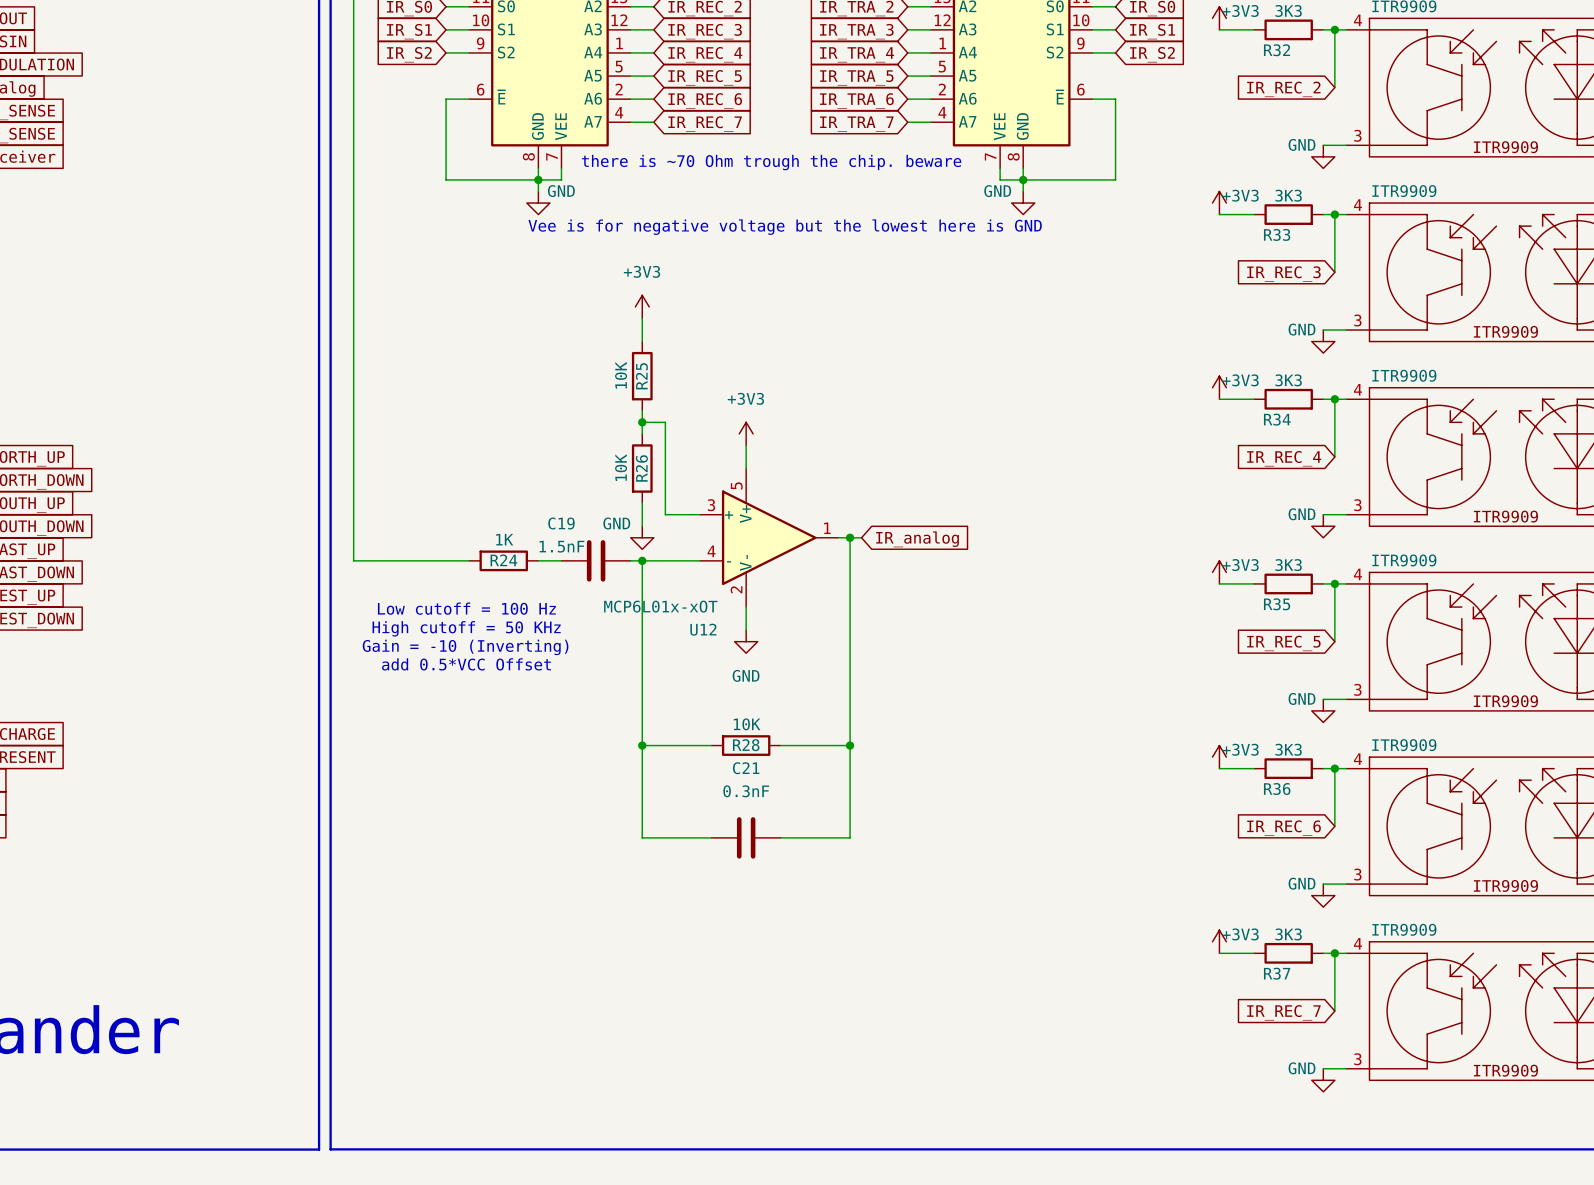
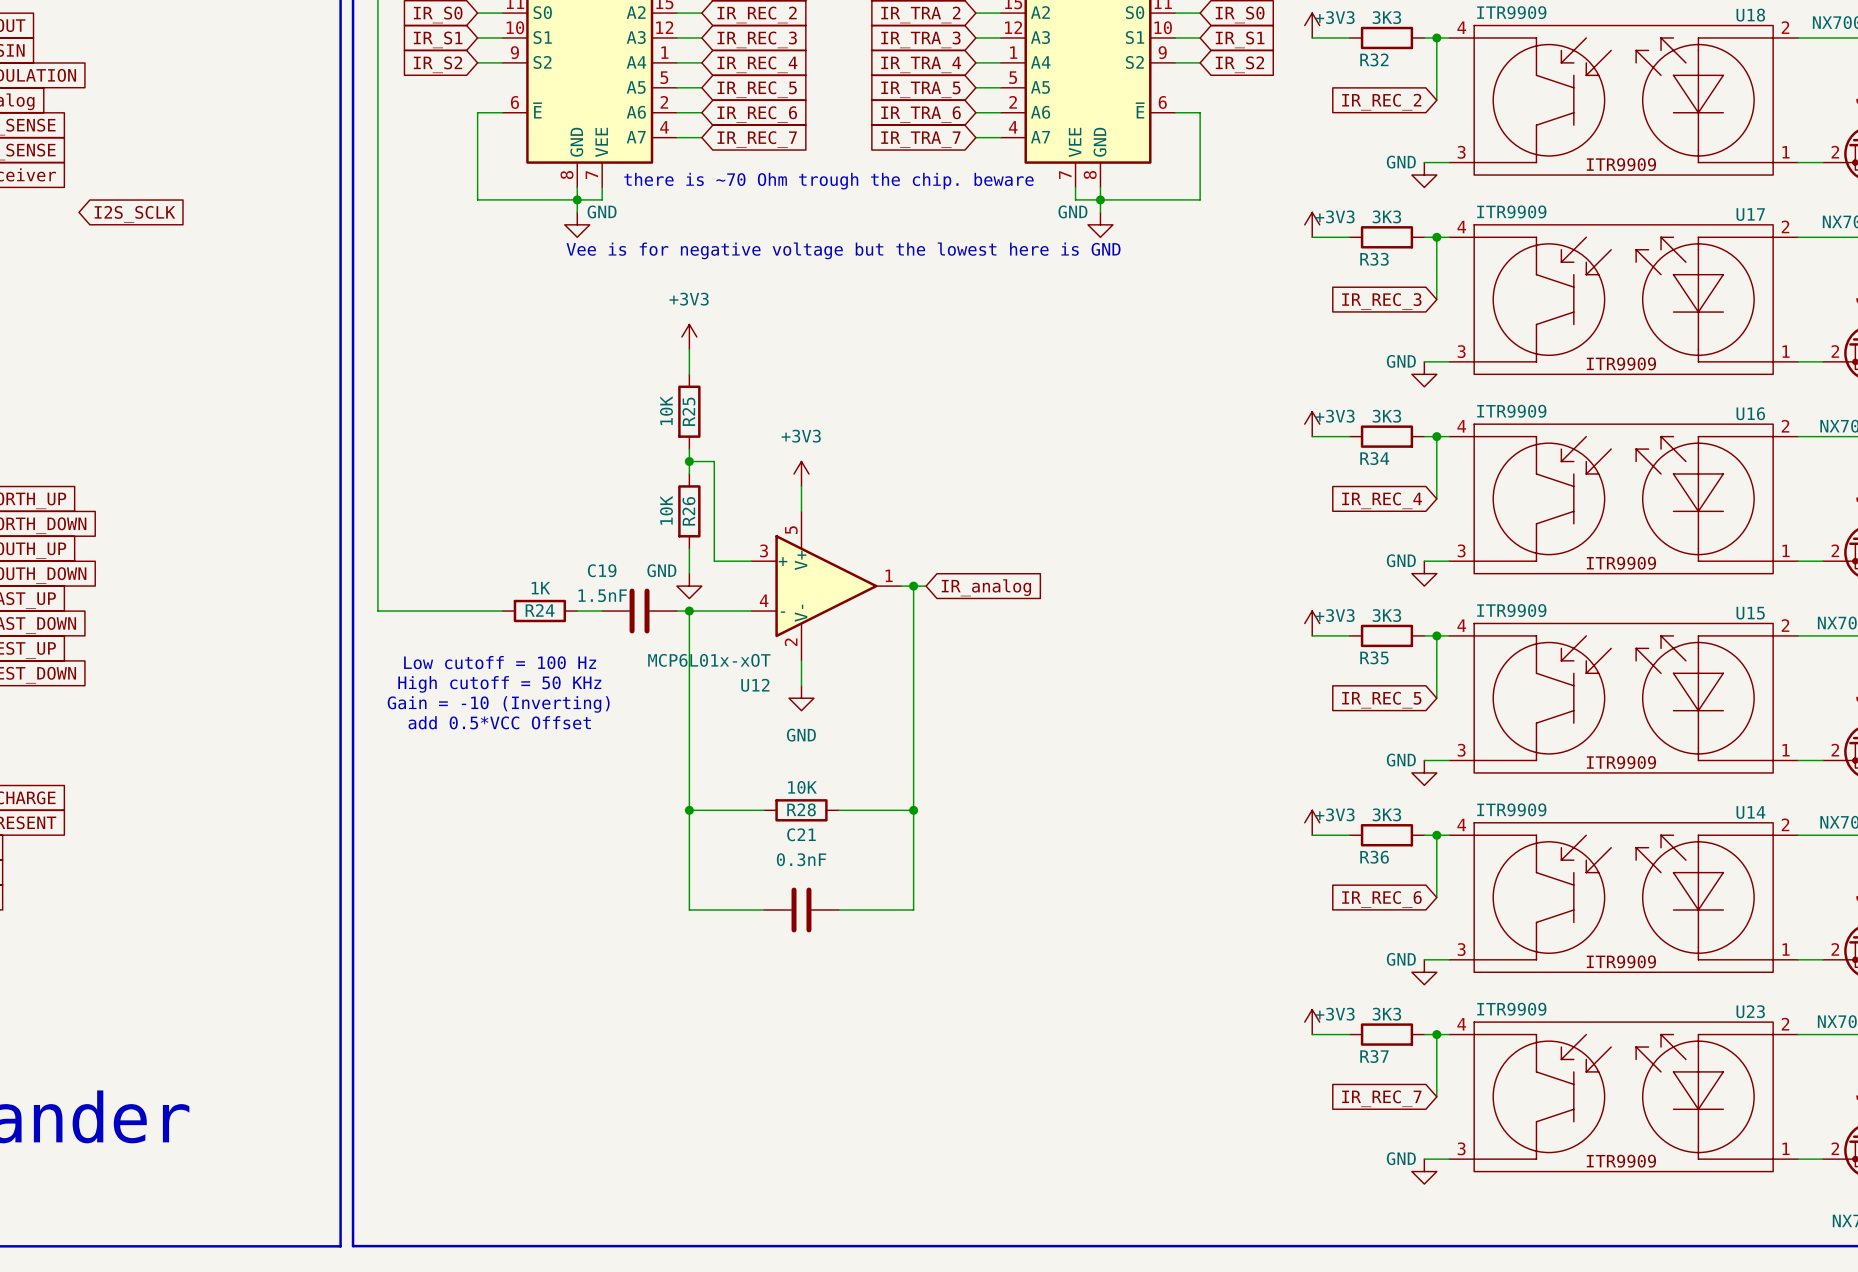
global label: none -> I2S_SCLK (134, 214)

